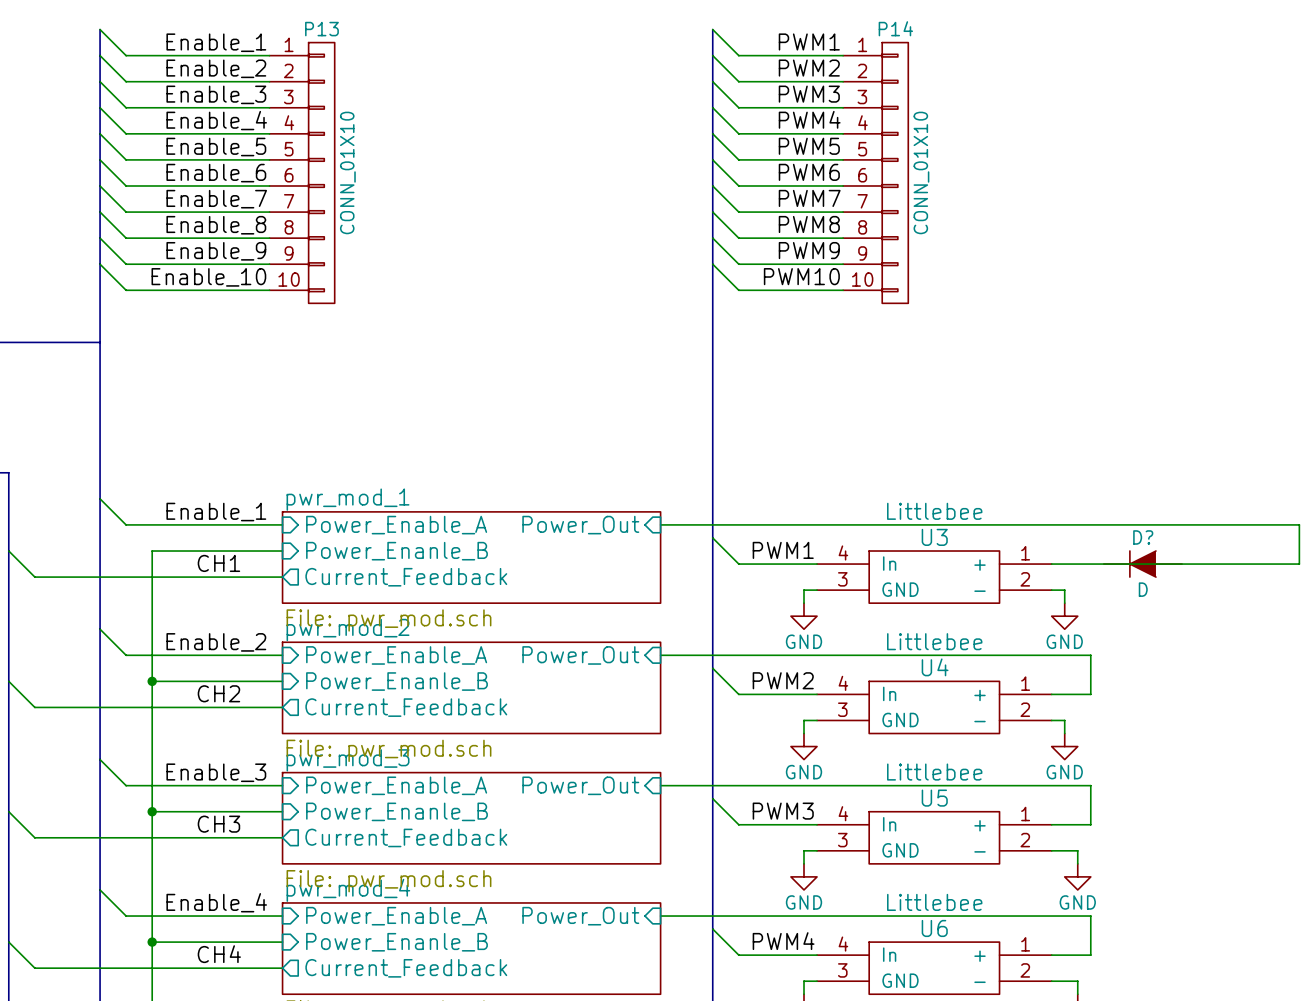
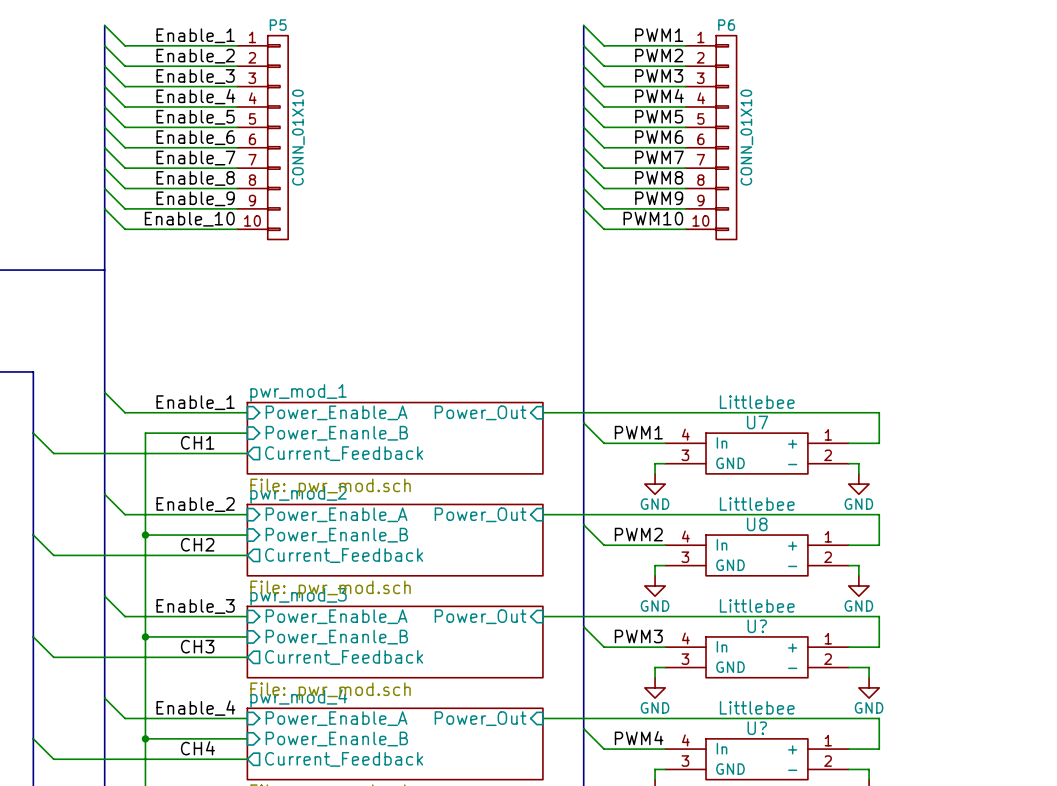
P14 name: P14 (895, 28) -> P6 (726, 25)
P13 name: P13 (321, 29) -> P5 (278, 25)
wire: (1090, 524) (1299, 524) (1299, 564) (1090, 564) -> (879, 412) (879, 443)
U3 name: U3 (934, 537) -> U7 (757, 422)
D?: D (1142, 564) -> none
U4 name: U4 (935, 667) -> U8 (757, 524)
U5 name: U5 (934, 798) -> U? (757, 626)
U6 name: U6 (934, 928) -> U? (757, 728)

